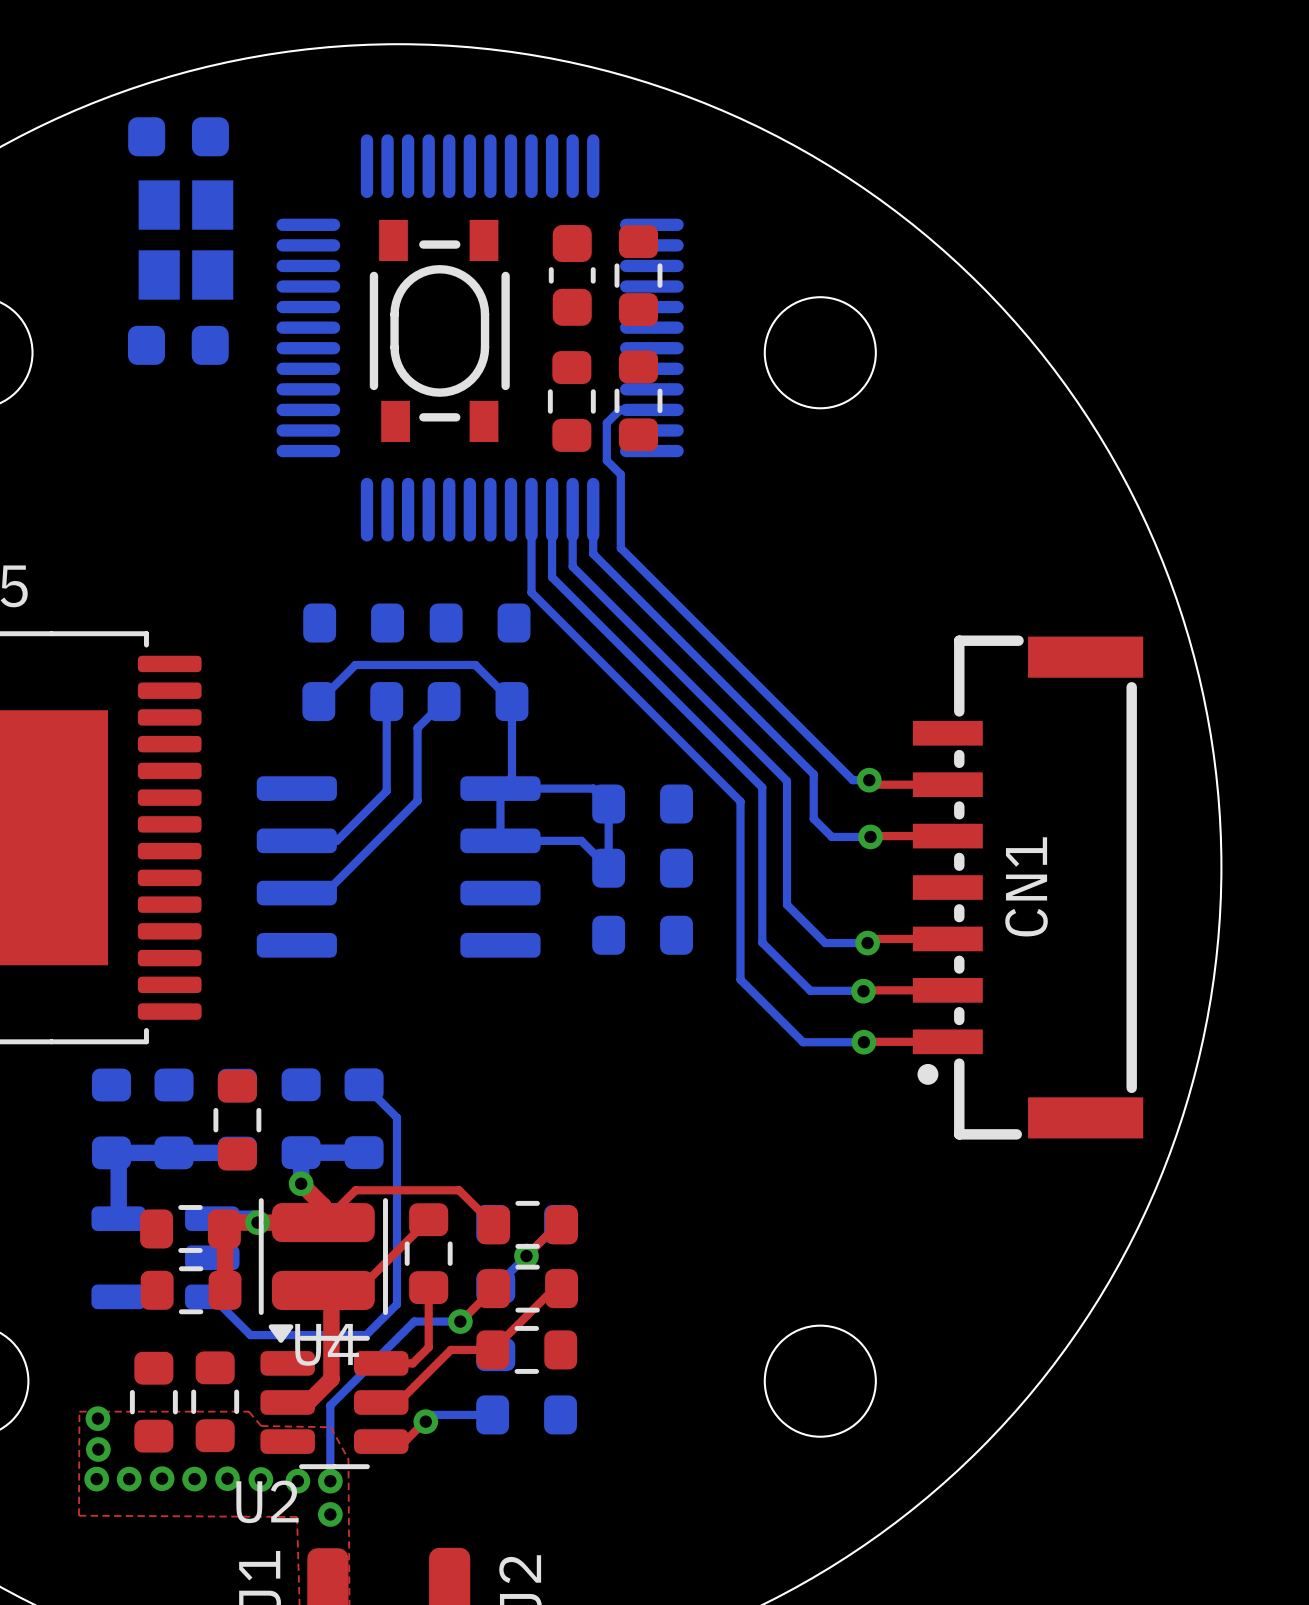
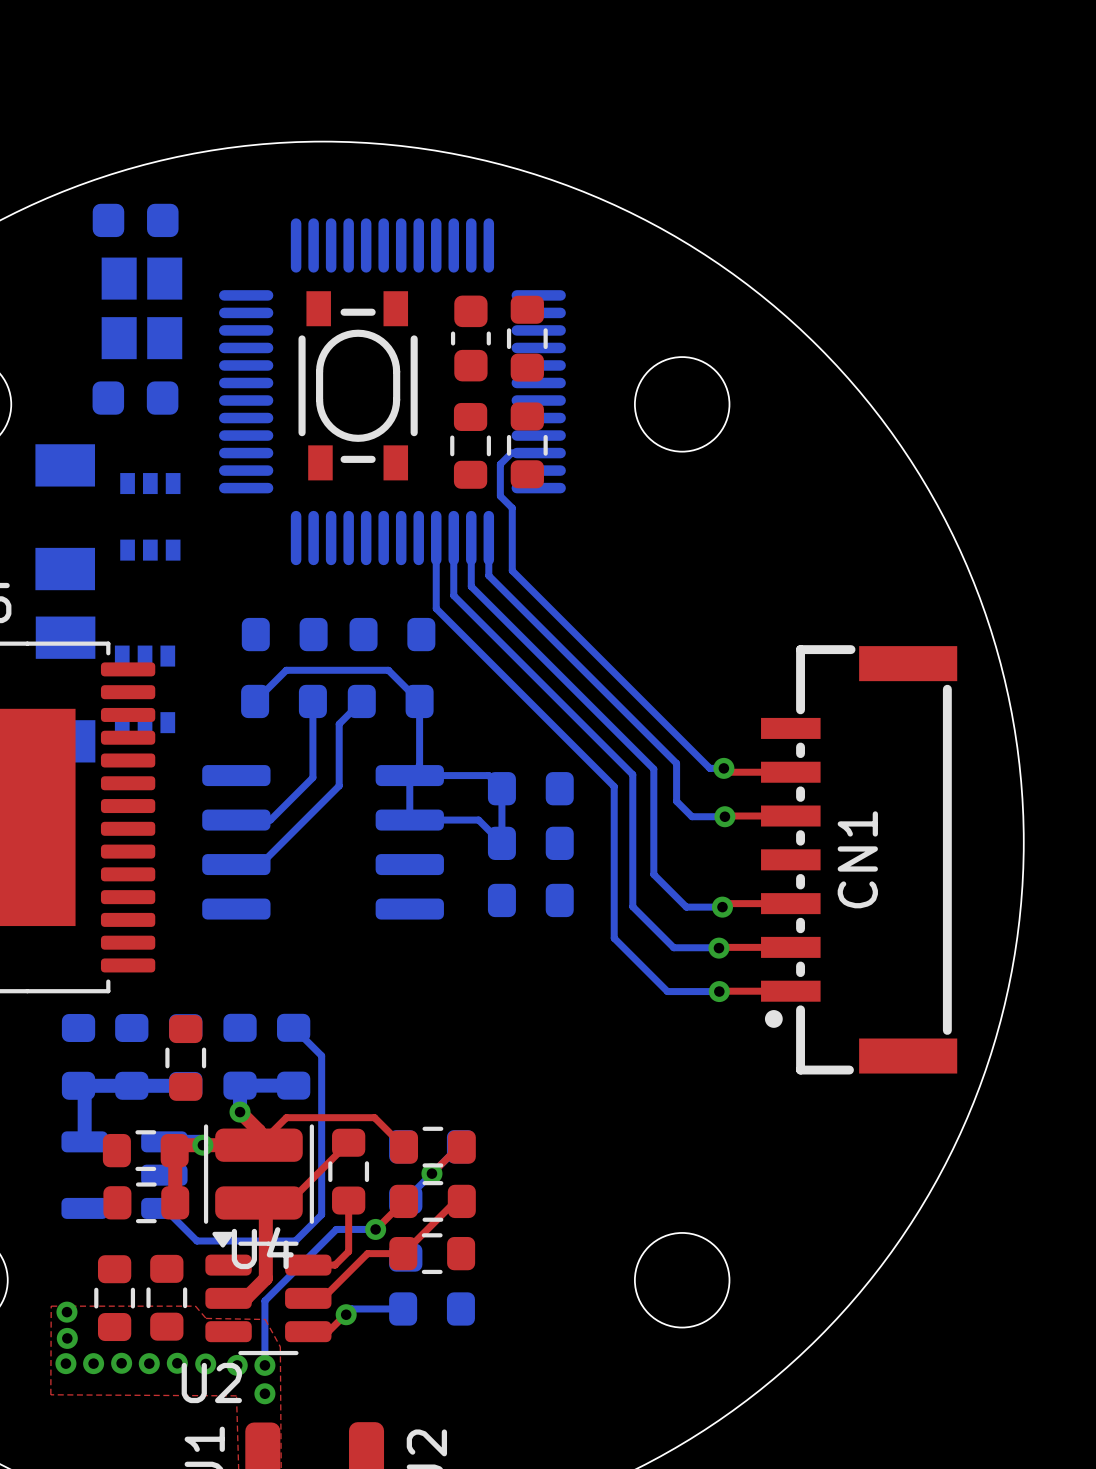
part: none -> (150, 516)
part: none -> (65, 517)
part: none -> (65, 689)
part: none -> (145, 689)

